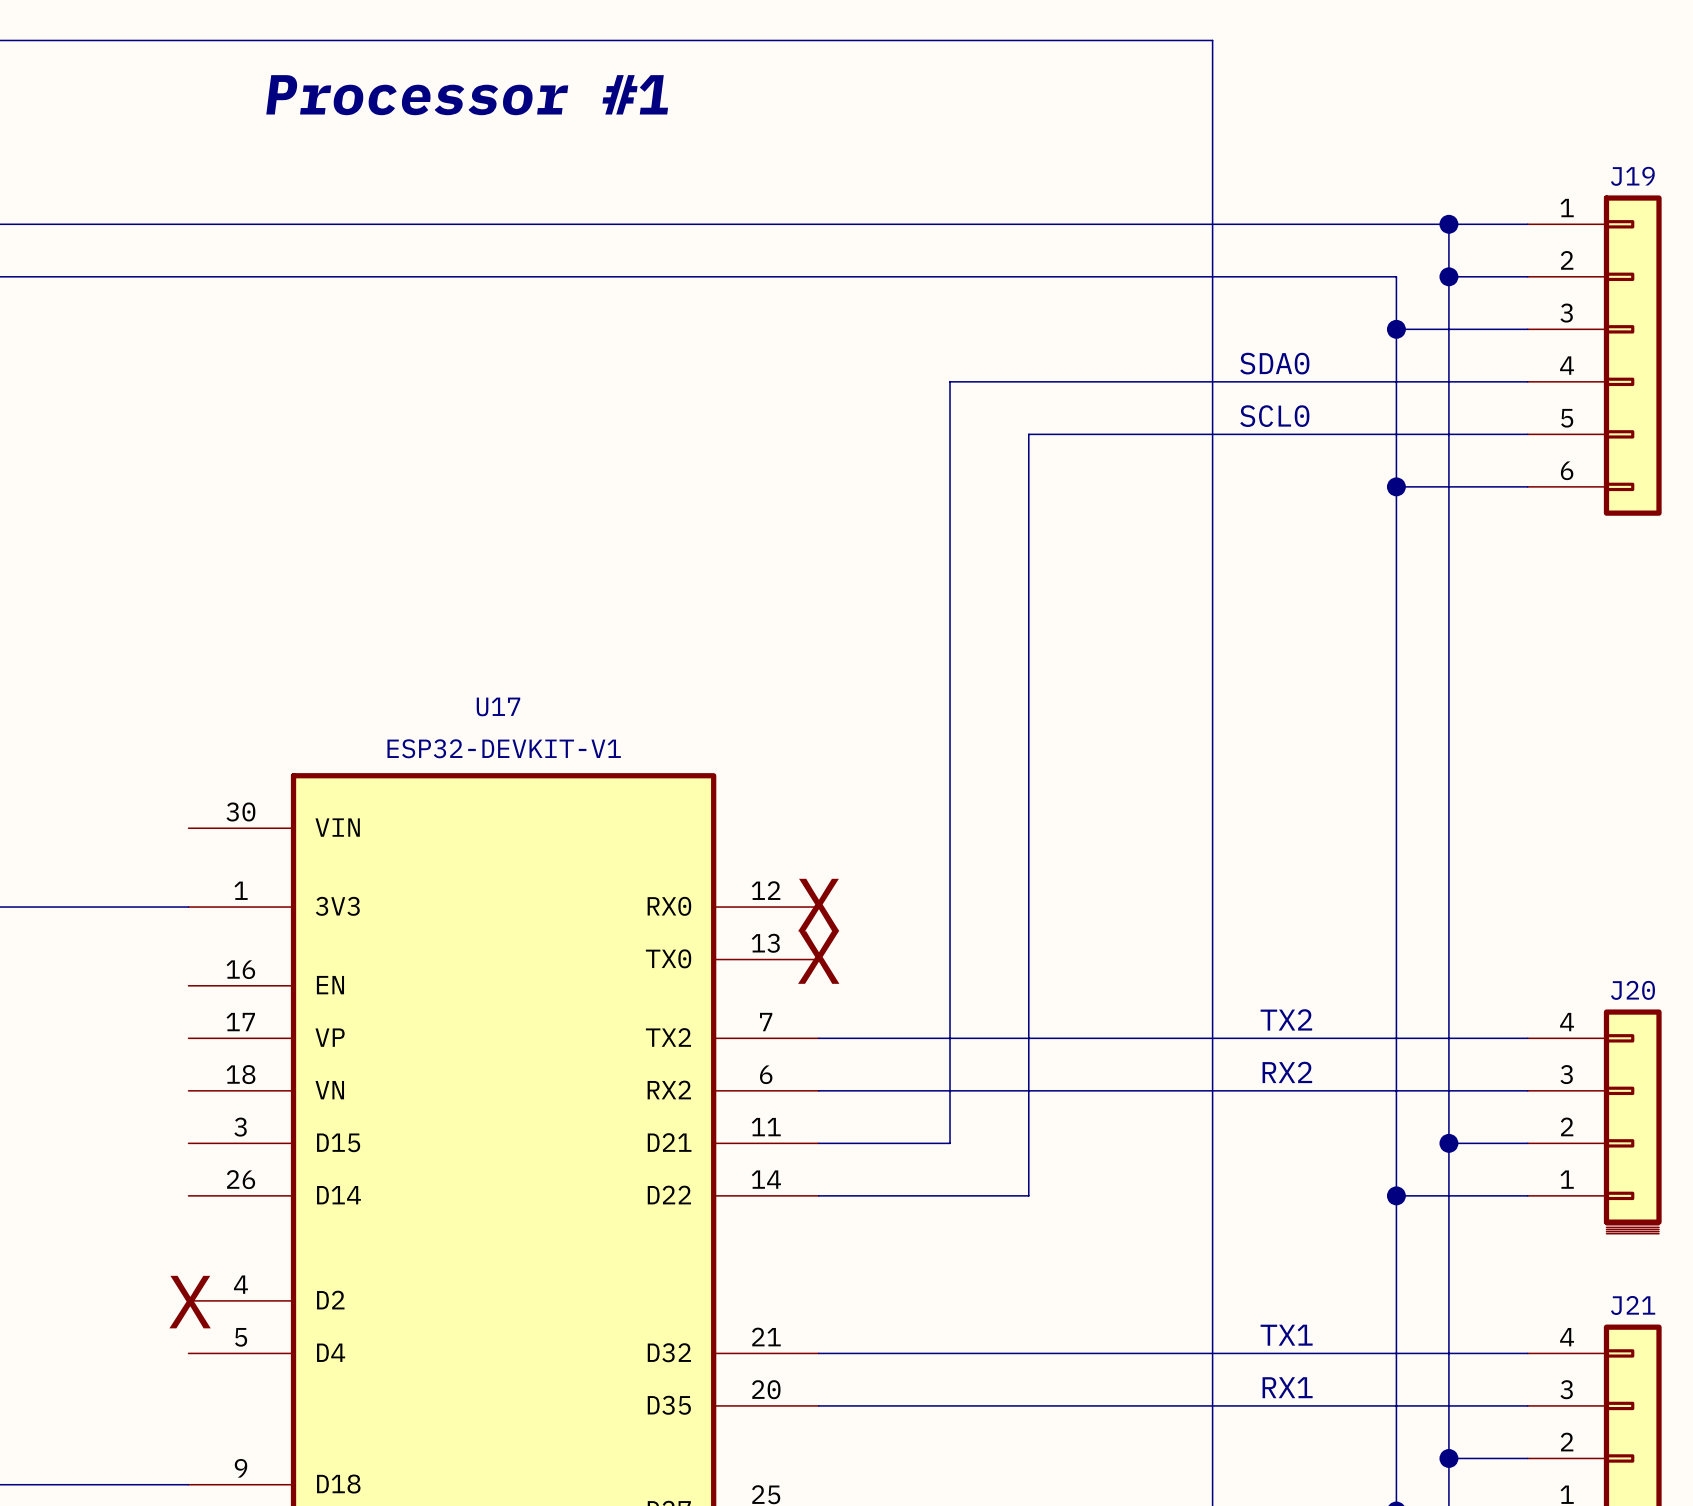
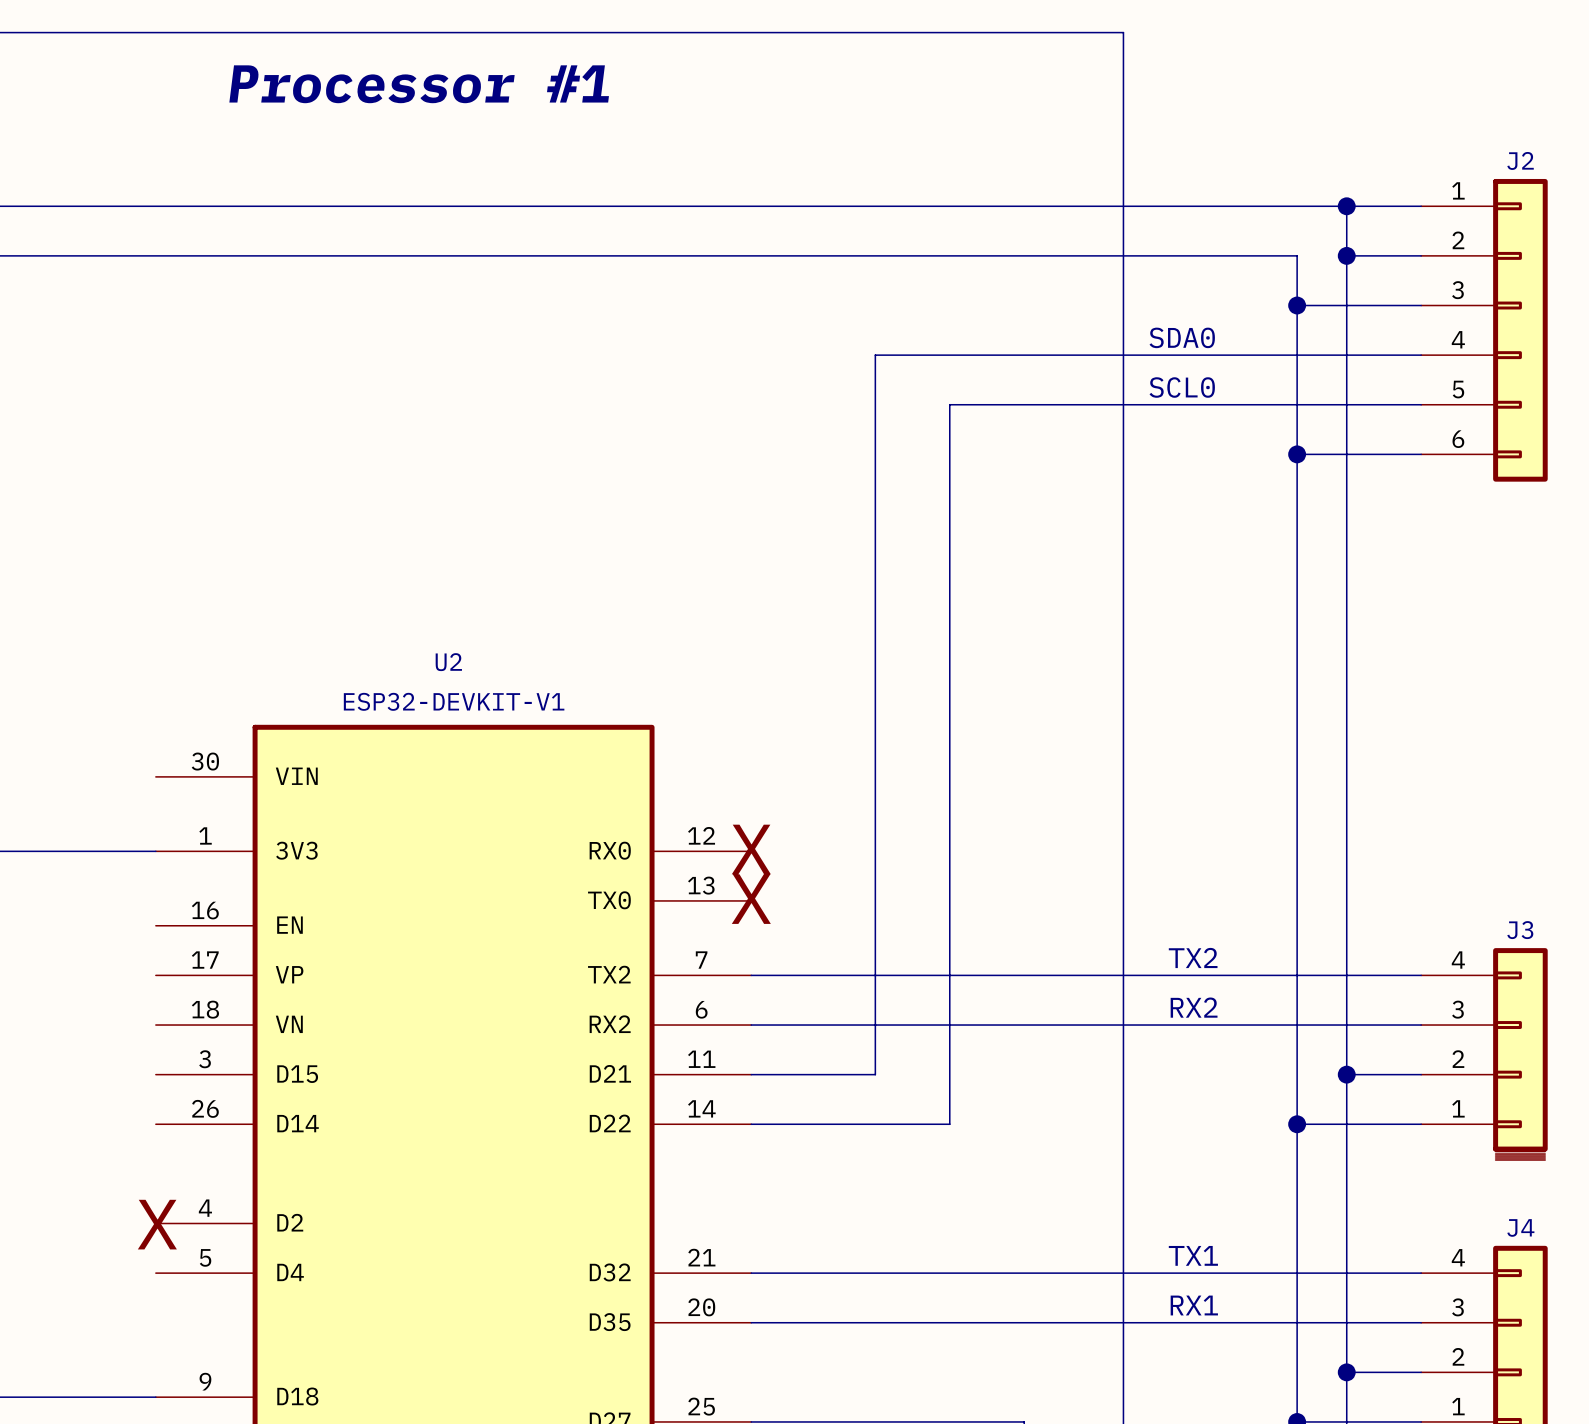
J19 name: J19 (1632, 176) -> J2 (1520, 160)
U17 name: U17 (498, 706) -> U2 (448, 662)
J20 name: J20 (1632, 990) -> J3 (1520, 930)
J21 name: J21 (1633, 1305) -> J4 (1520, 1227)

